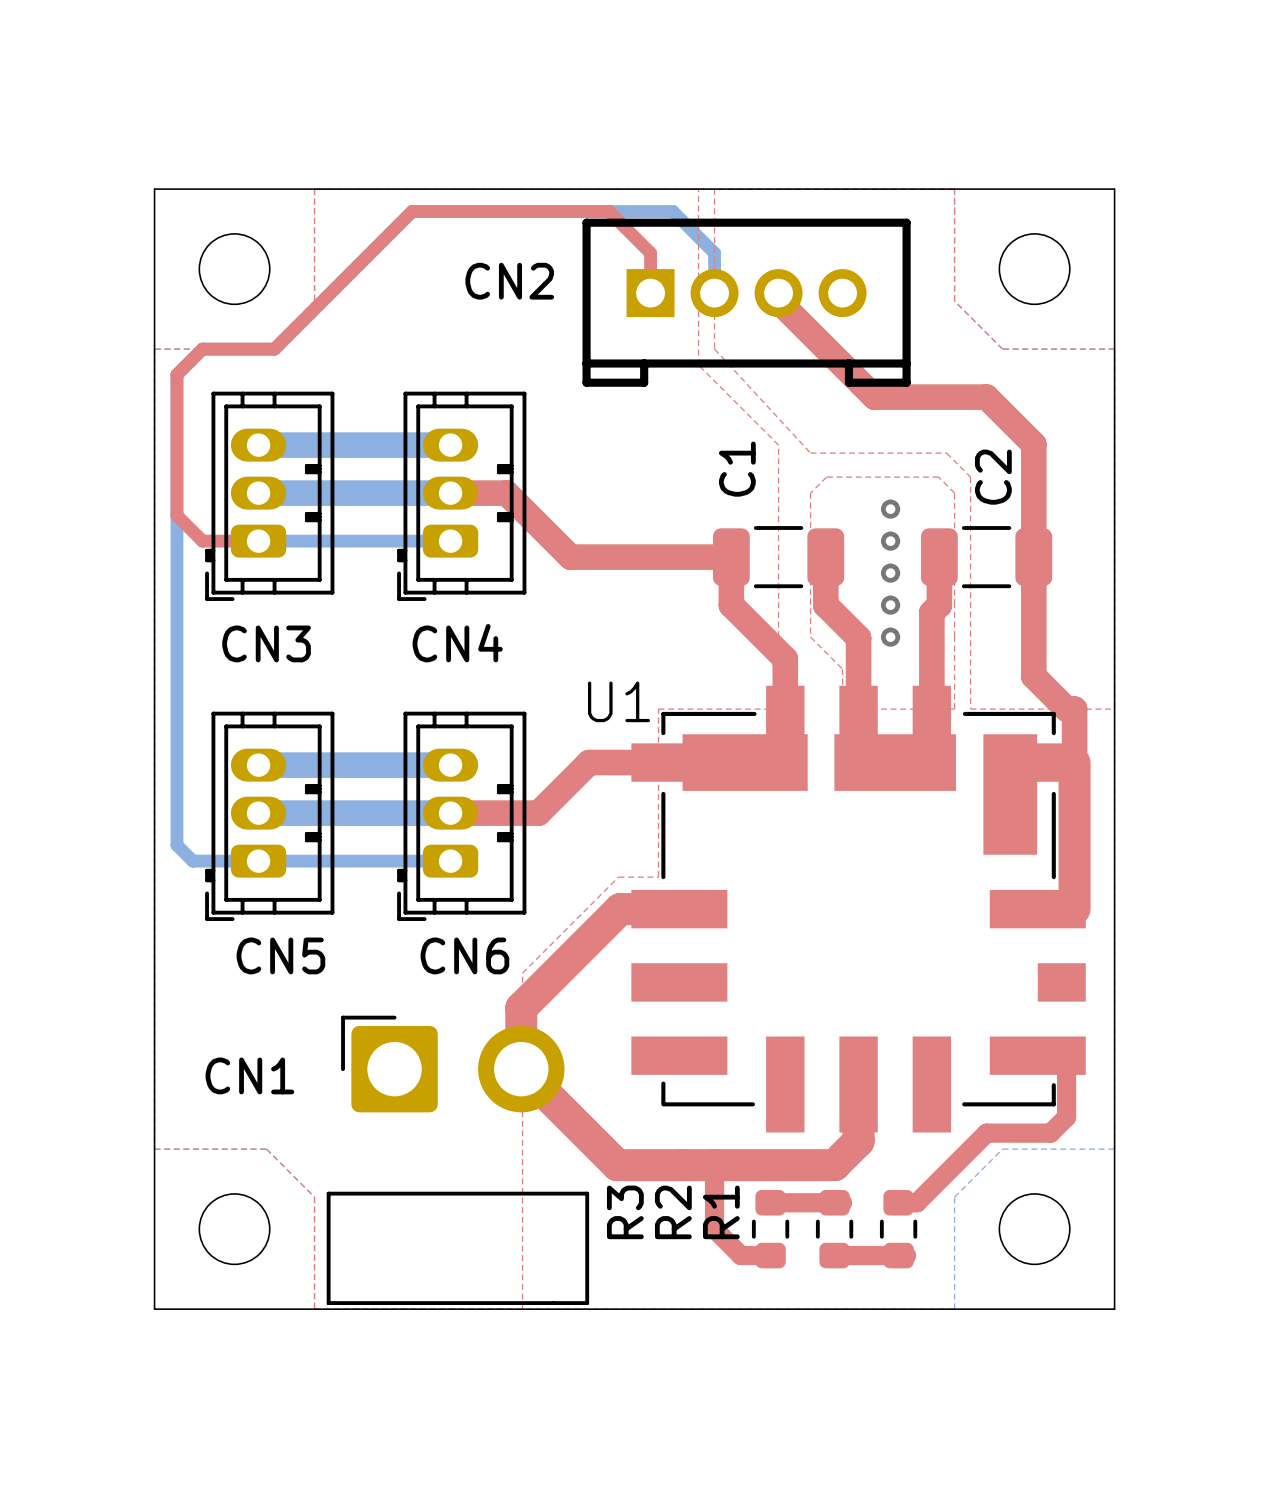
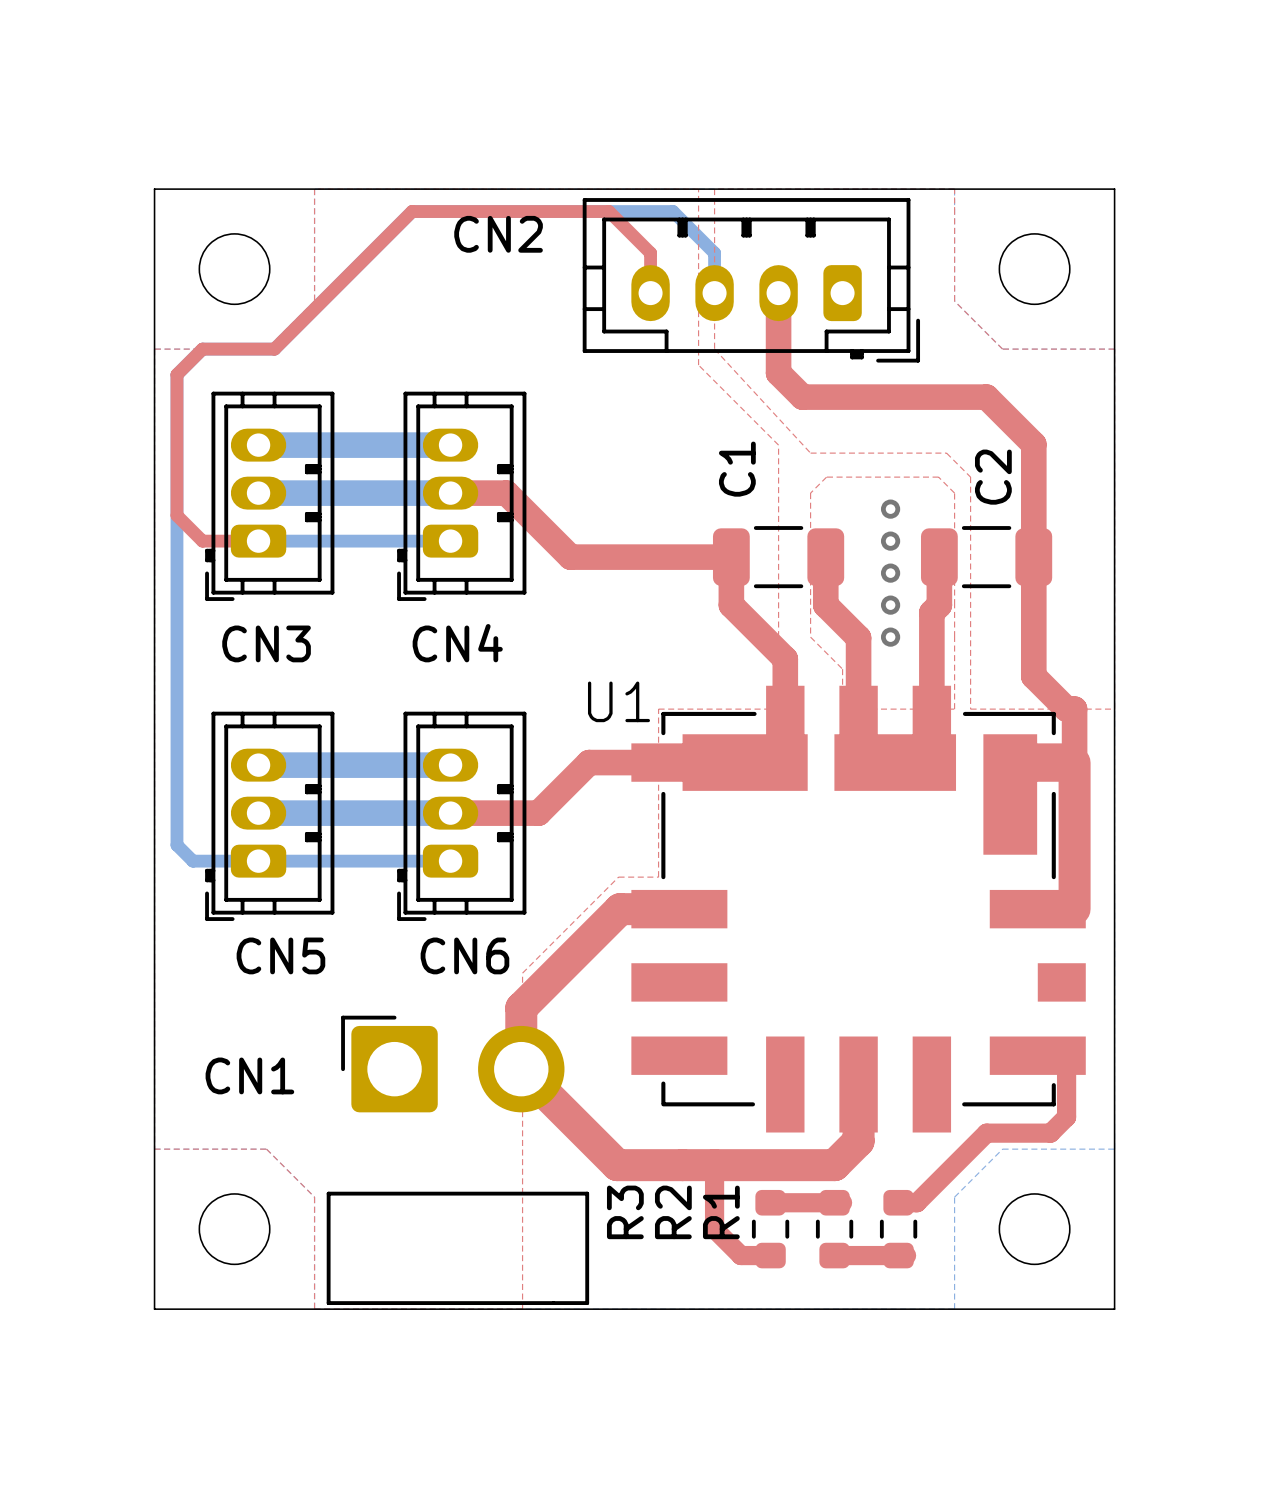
CN2 footprint: [582, 218, 911, 387] -> [582, 198, 921, 363]
top track: (778, 301) (874, 397) -> (778, 301) (778, 373) (802, 397) (874, 397)

